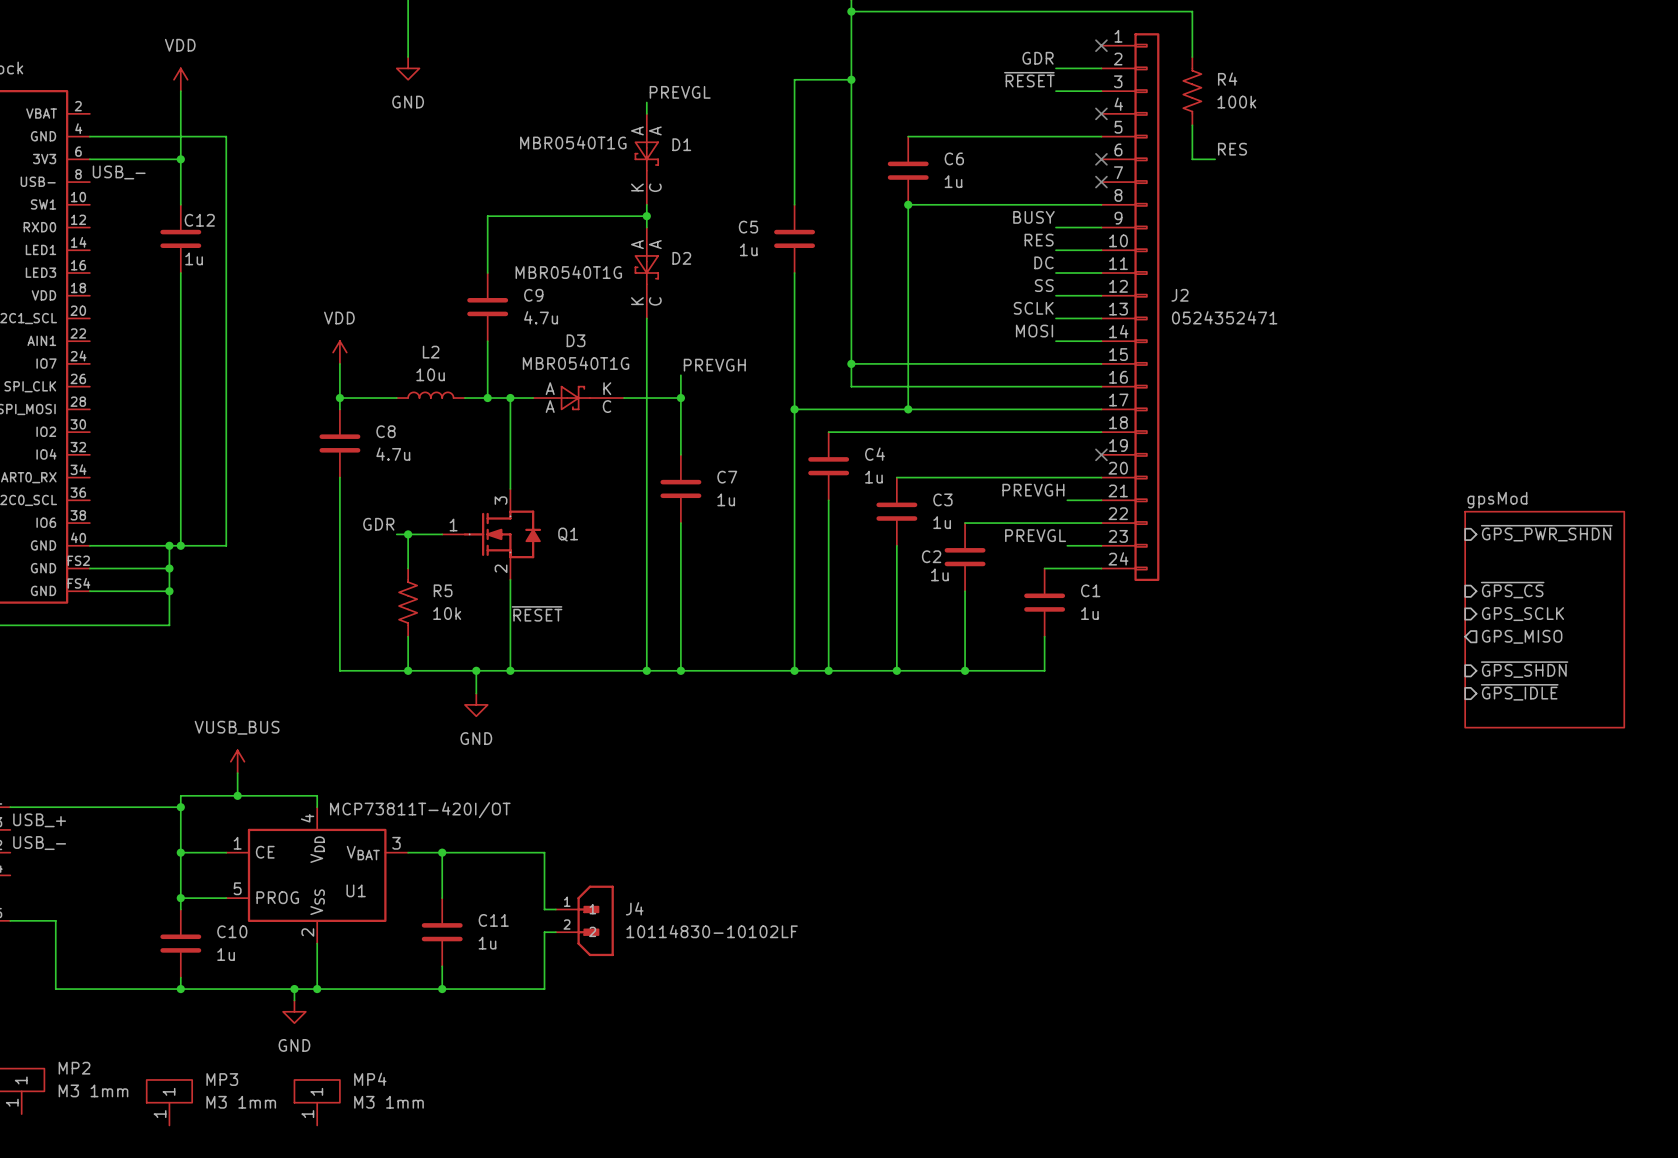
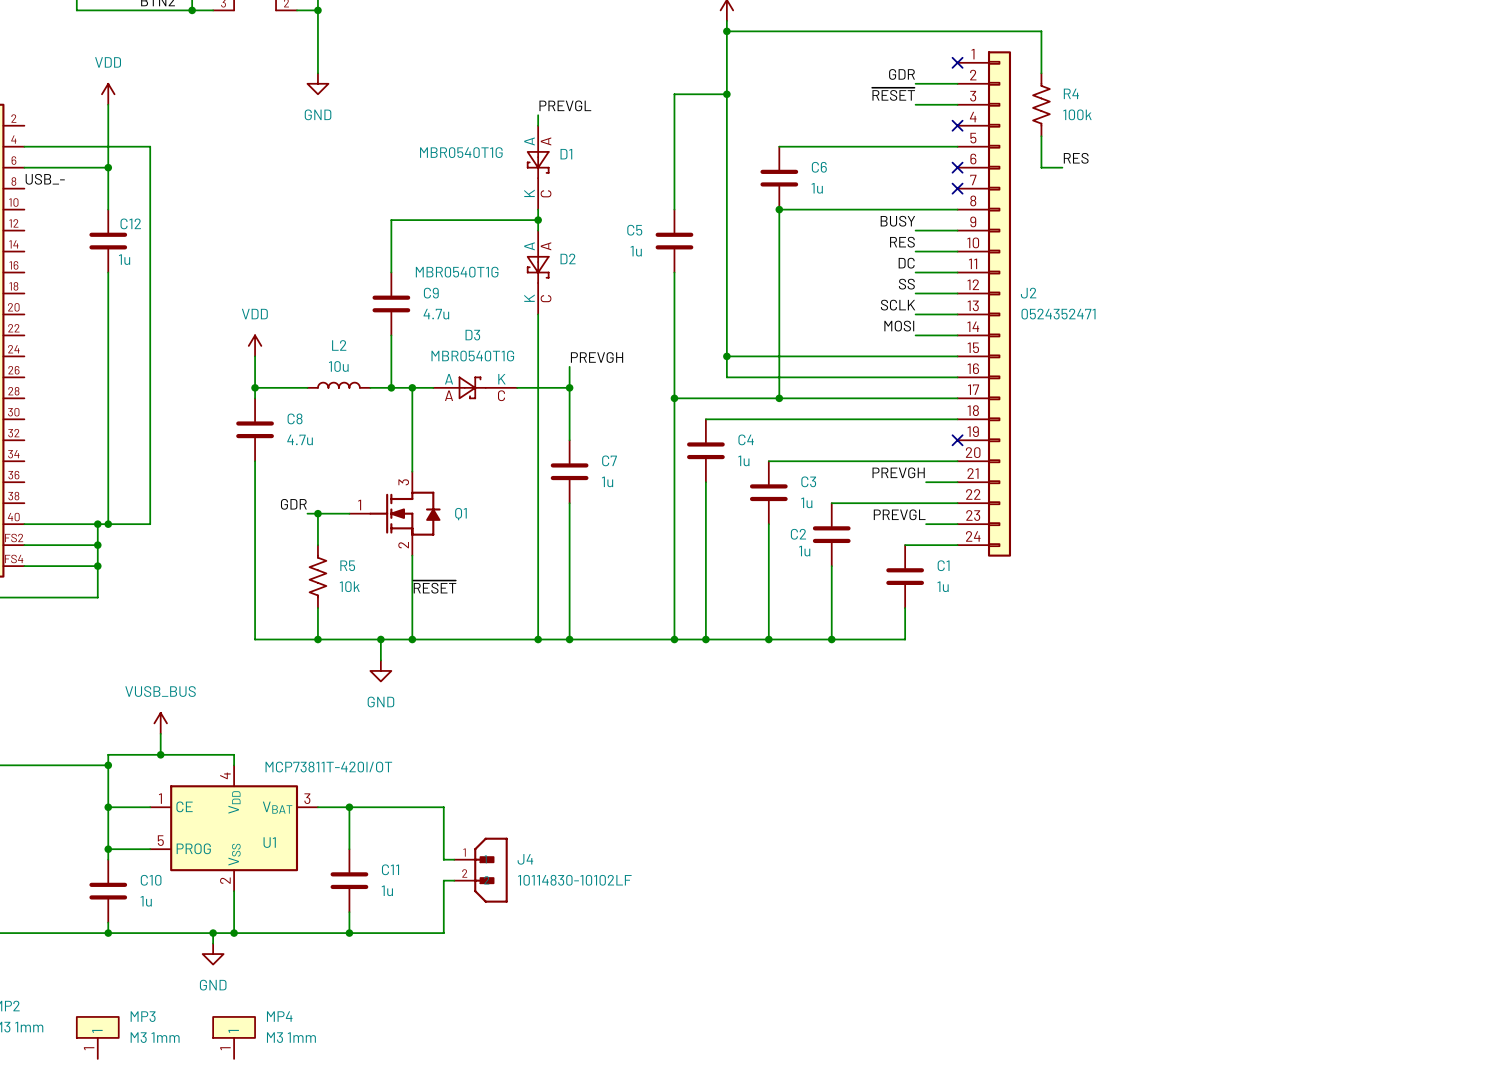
sheet pin: ~{GPS_PWR_SHDN} (1546, 533) -> none
sheet pin: ~{GPS_CS} (1512, 590) -> none
sheet pin: GPS_SCLK (1522, 614) -> none
sheet gpsMod: (1544, 619) -> none
sheet pin: GPS_MISO (1522, 636) -> none
sheet pin: ~{GPS_SHDN} (1524, 669) -> none
sheet pin: ~{GPS_IDLE} (1519, 692) -> none

